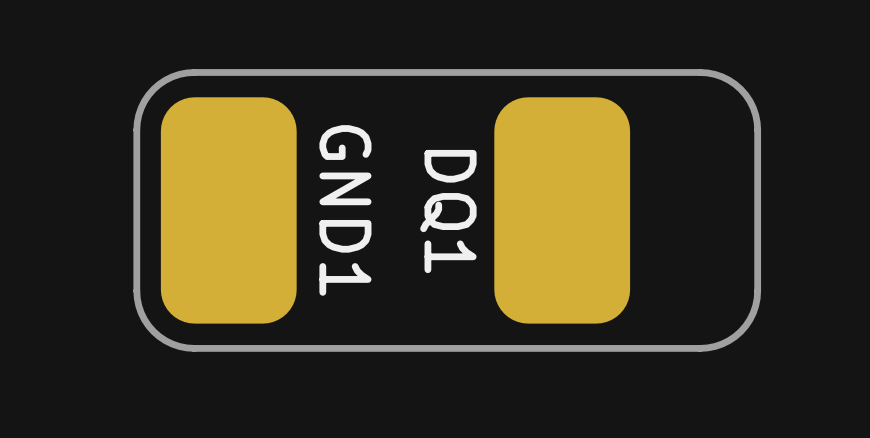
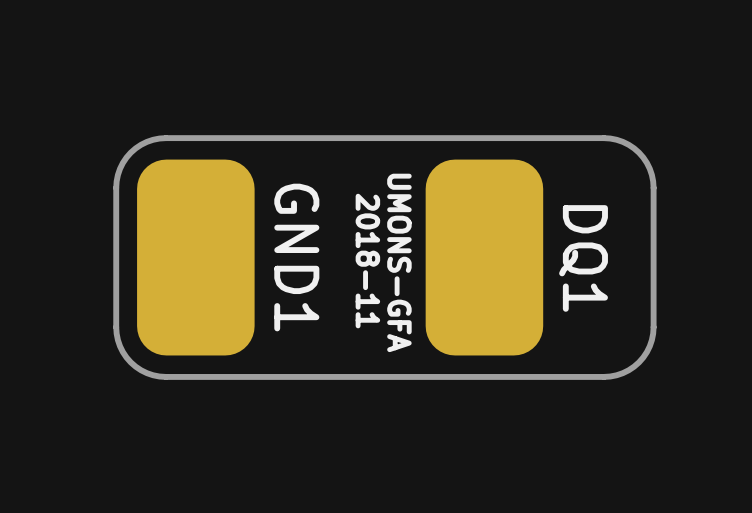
DQ1 name position: DQ1 (448, 211) -> DQ1 (583, 258)
text: none -> 2018-11 (367, 261)
text: none -> UMONS-GFA (399, 262)

